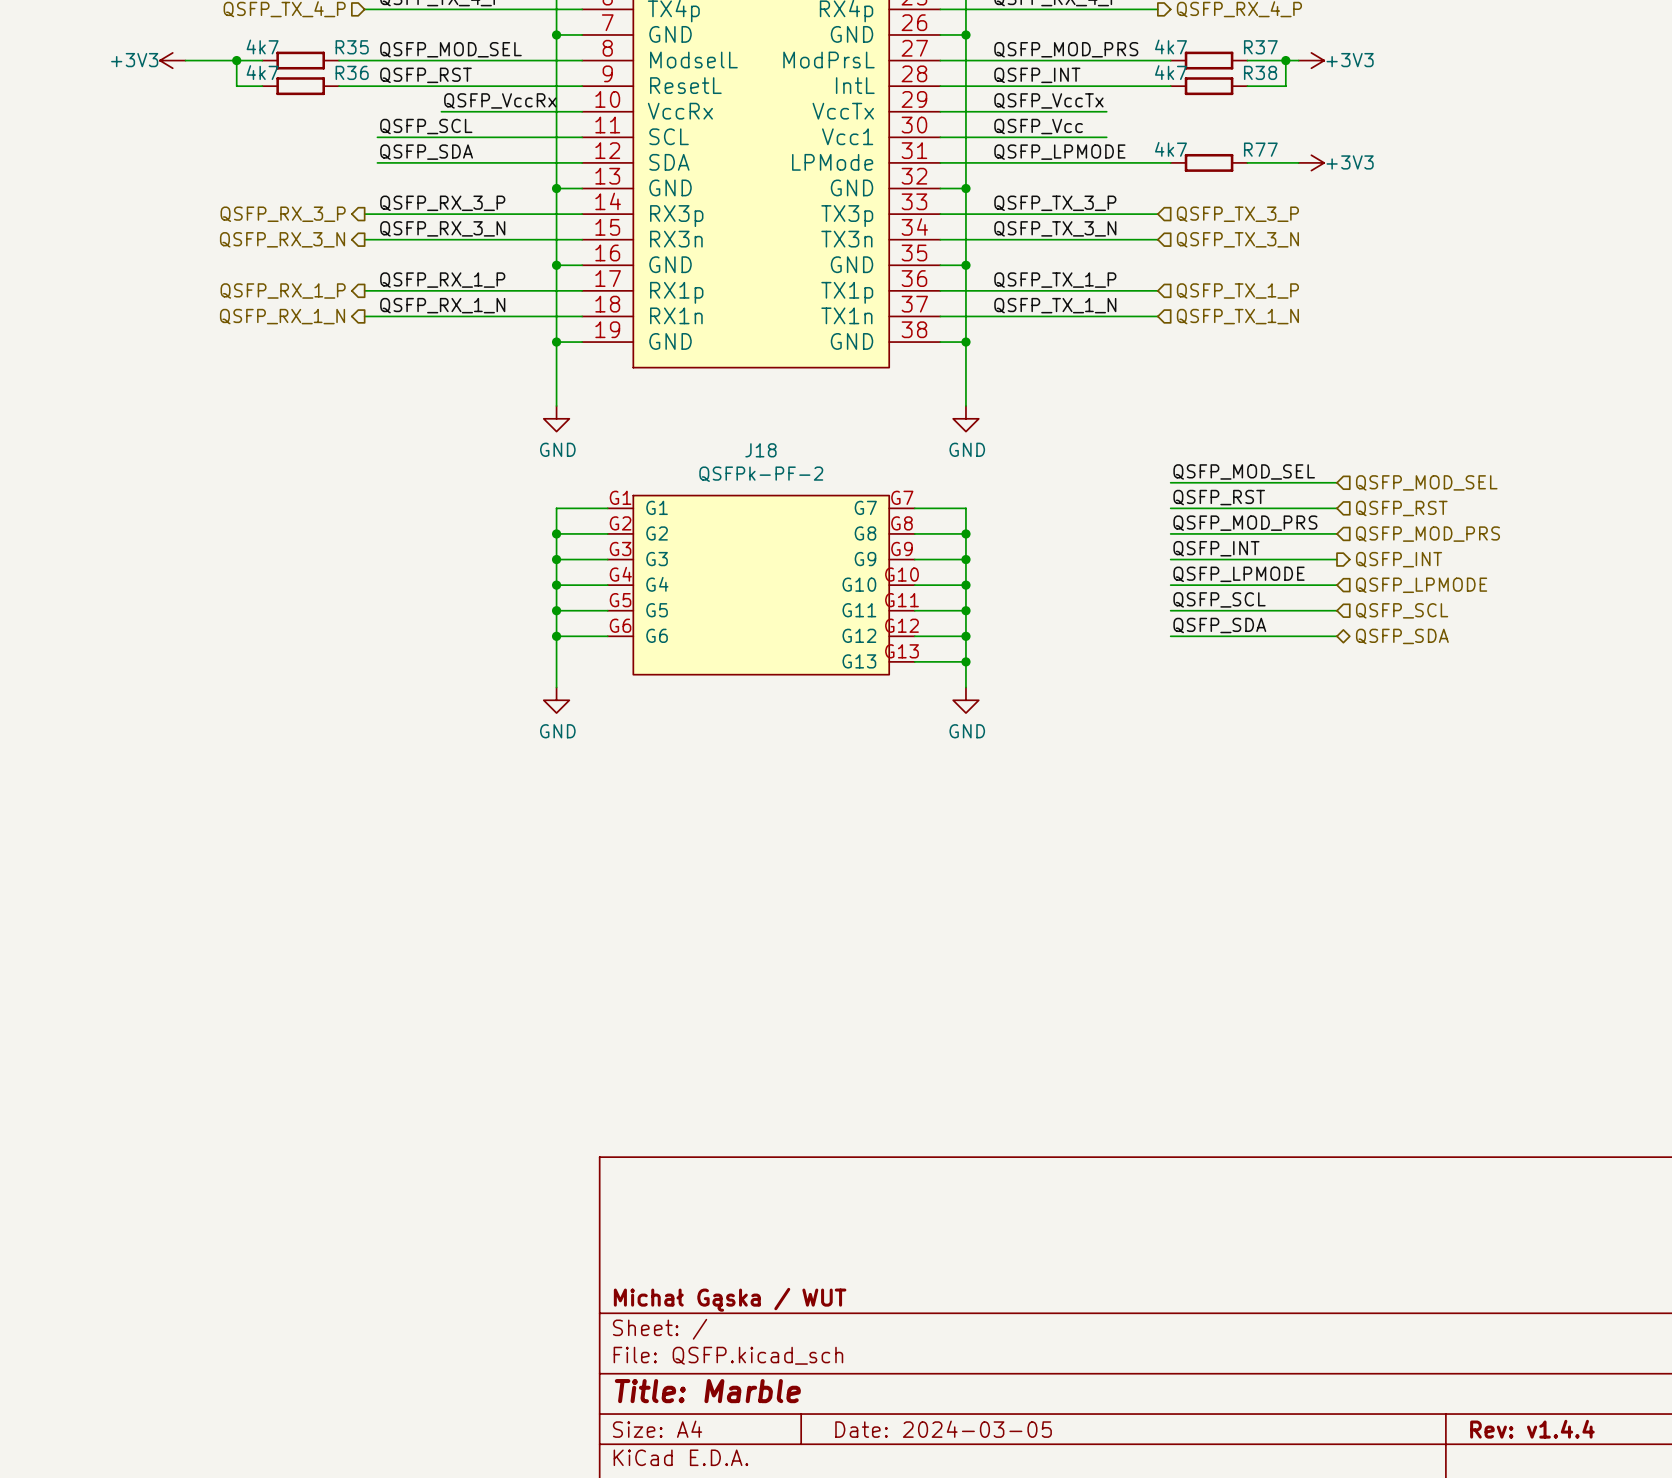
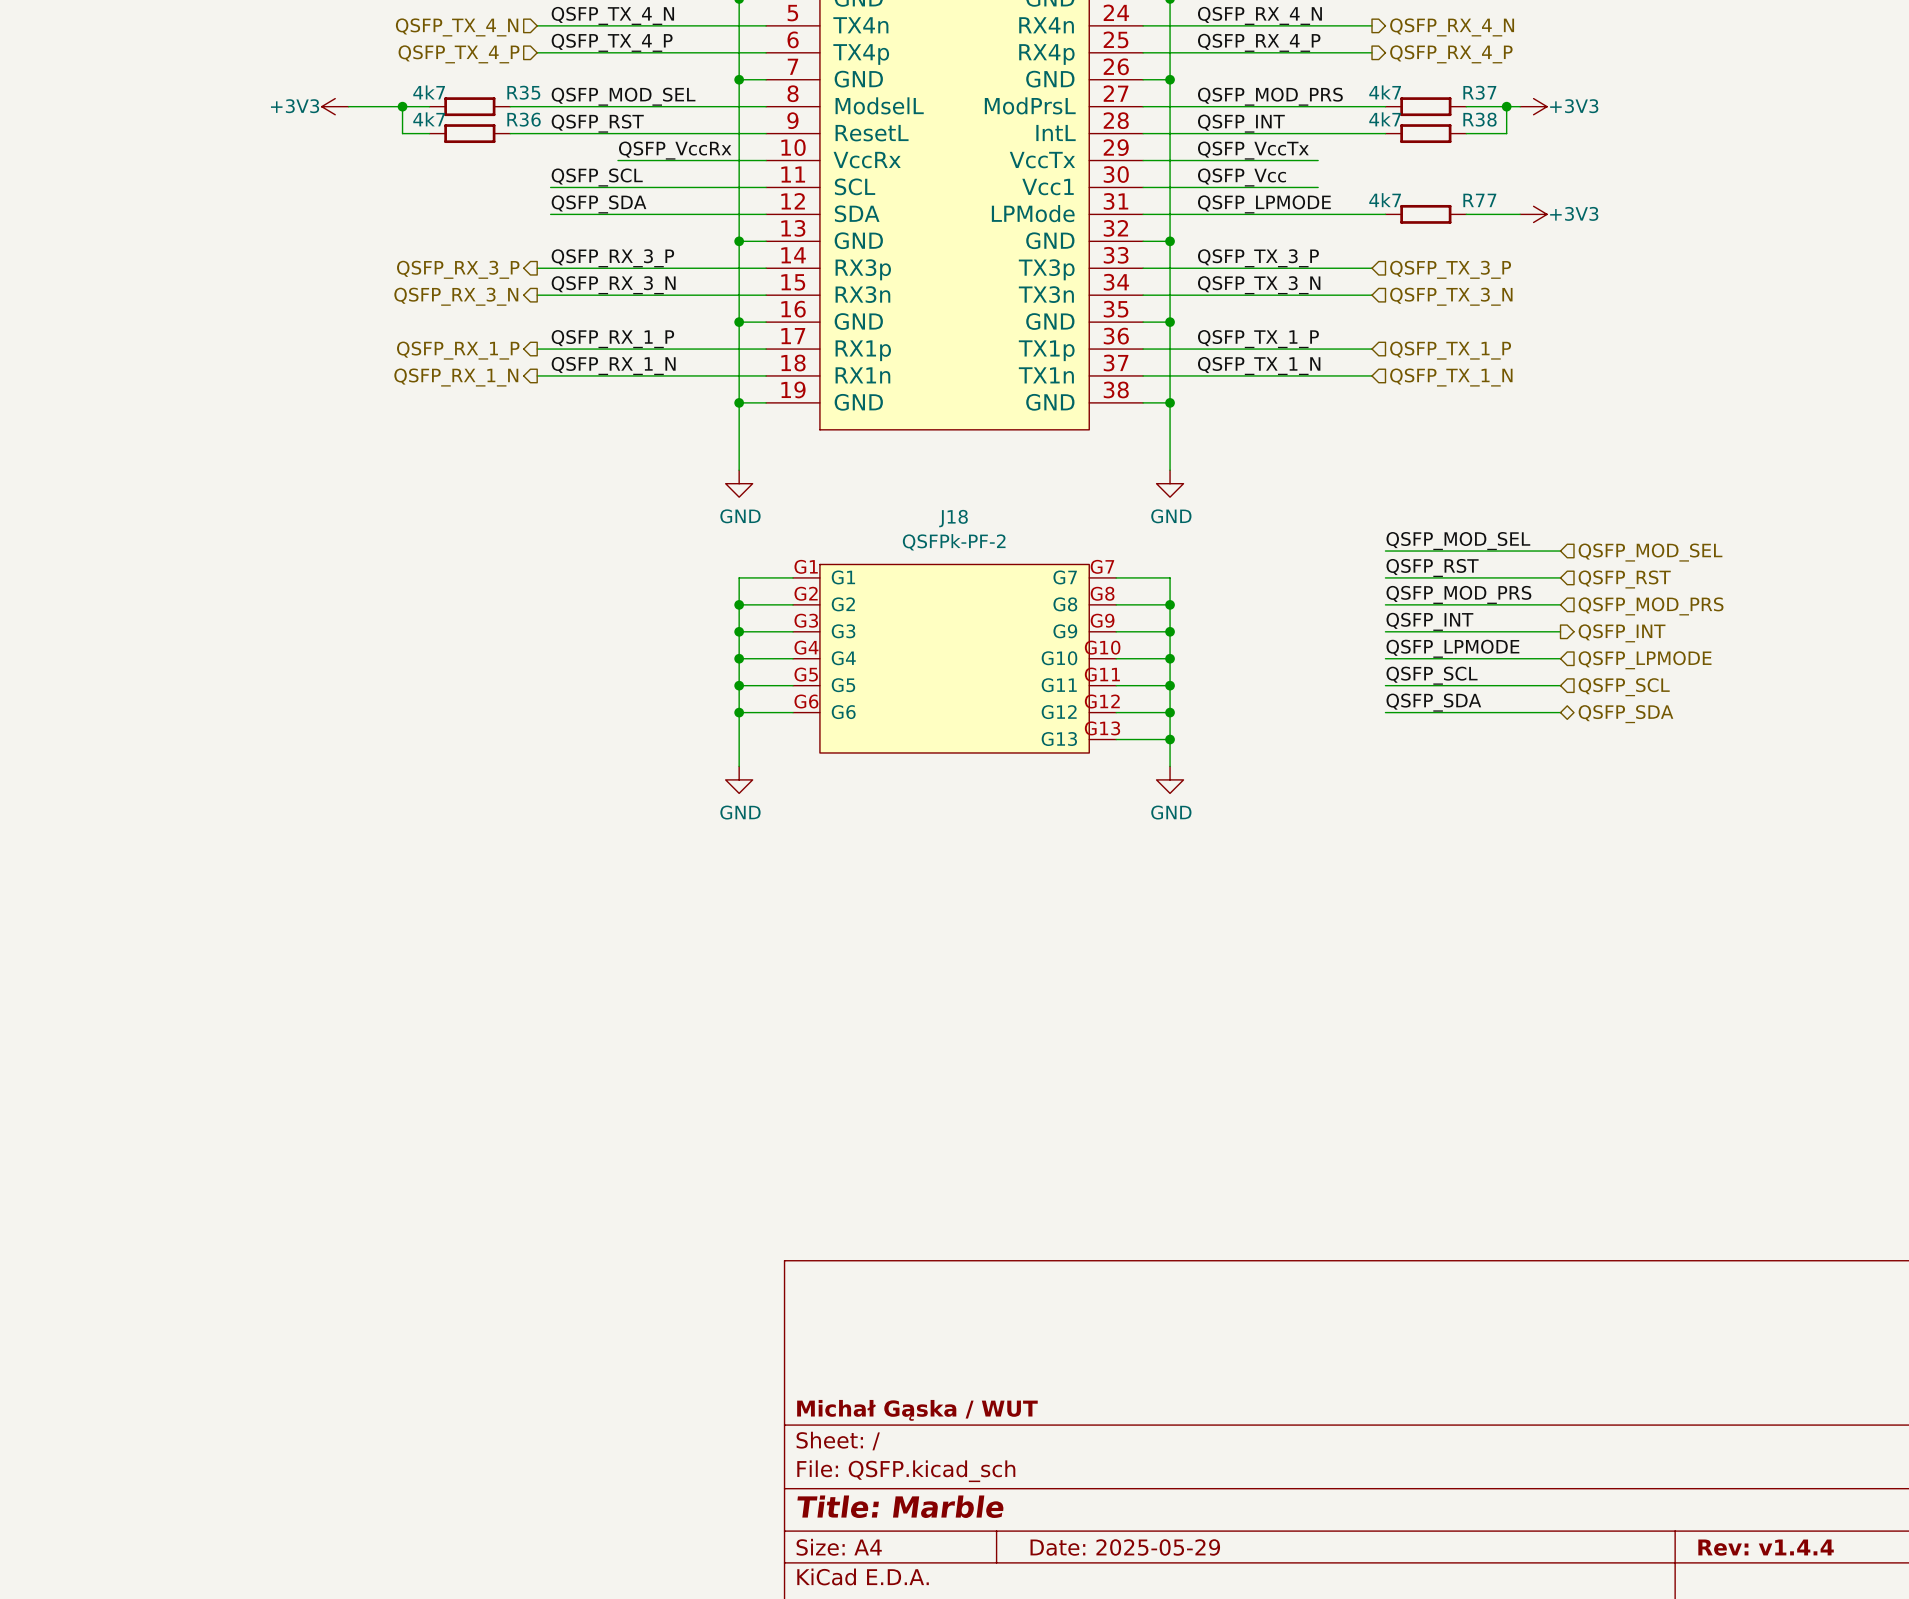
title block: Date: 2024-03-05 (943, 1429) -> Date: 2025-05-29 (1125, 1547)

